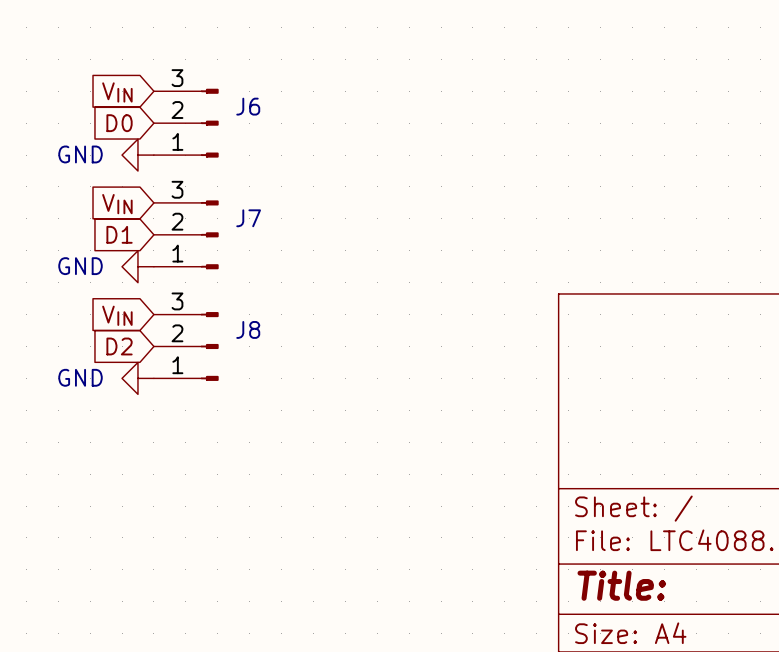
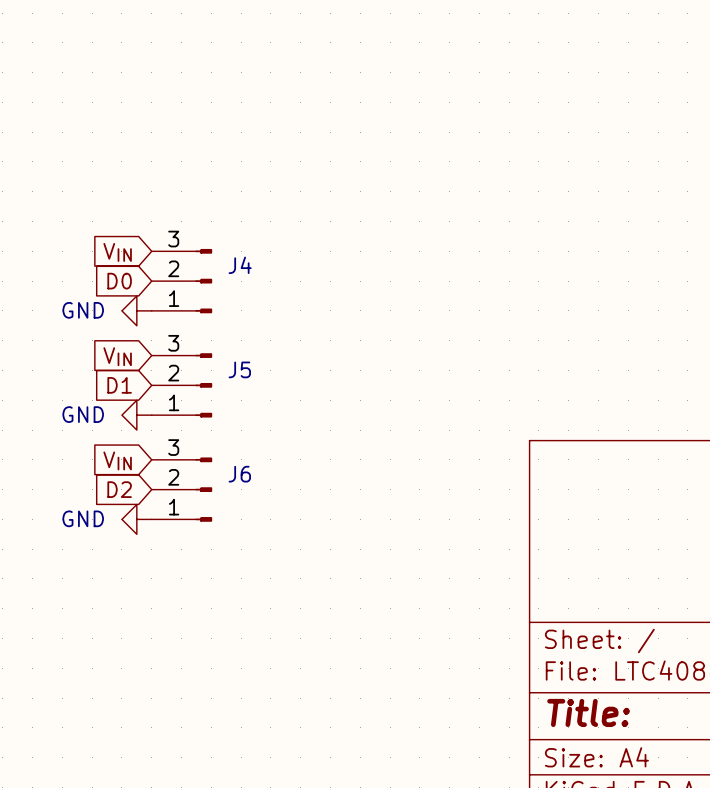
J6 name: J6 (248, 106) -> J4 (240, 265)
J7 name: J7 (248, 218) -> J5 (239, 369)
J8 name: J8 (248, 329) -> J6 (239, 474)

